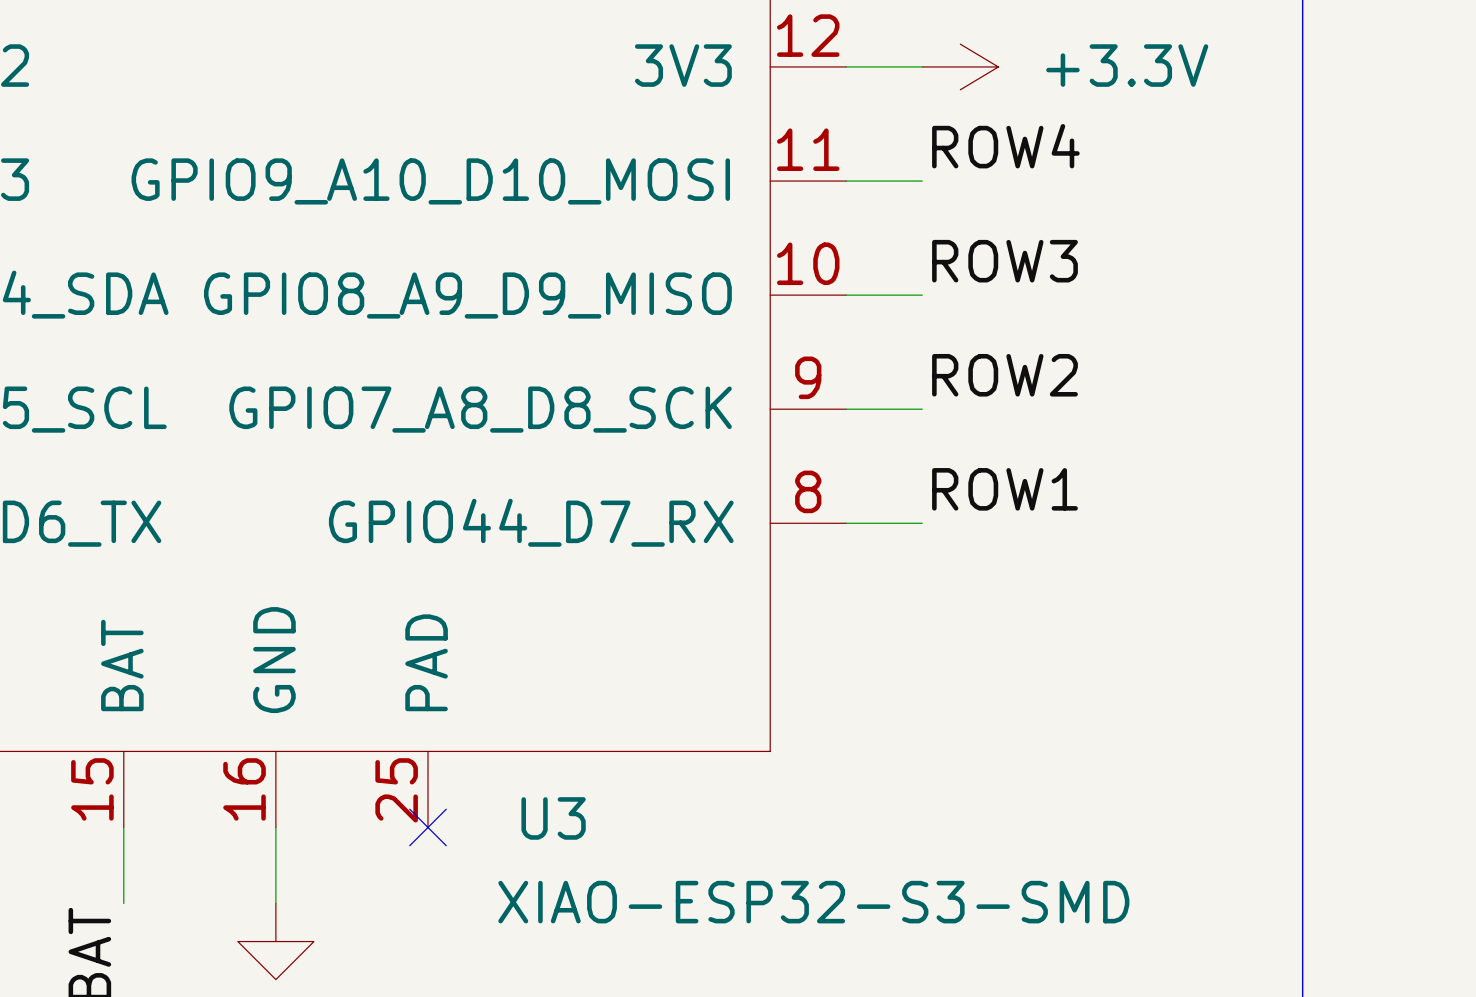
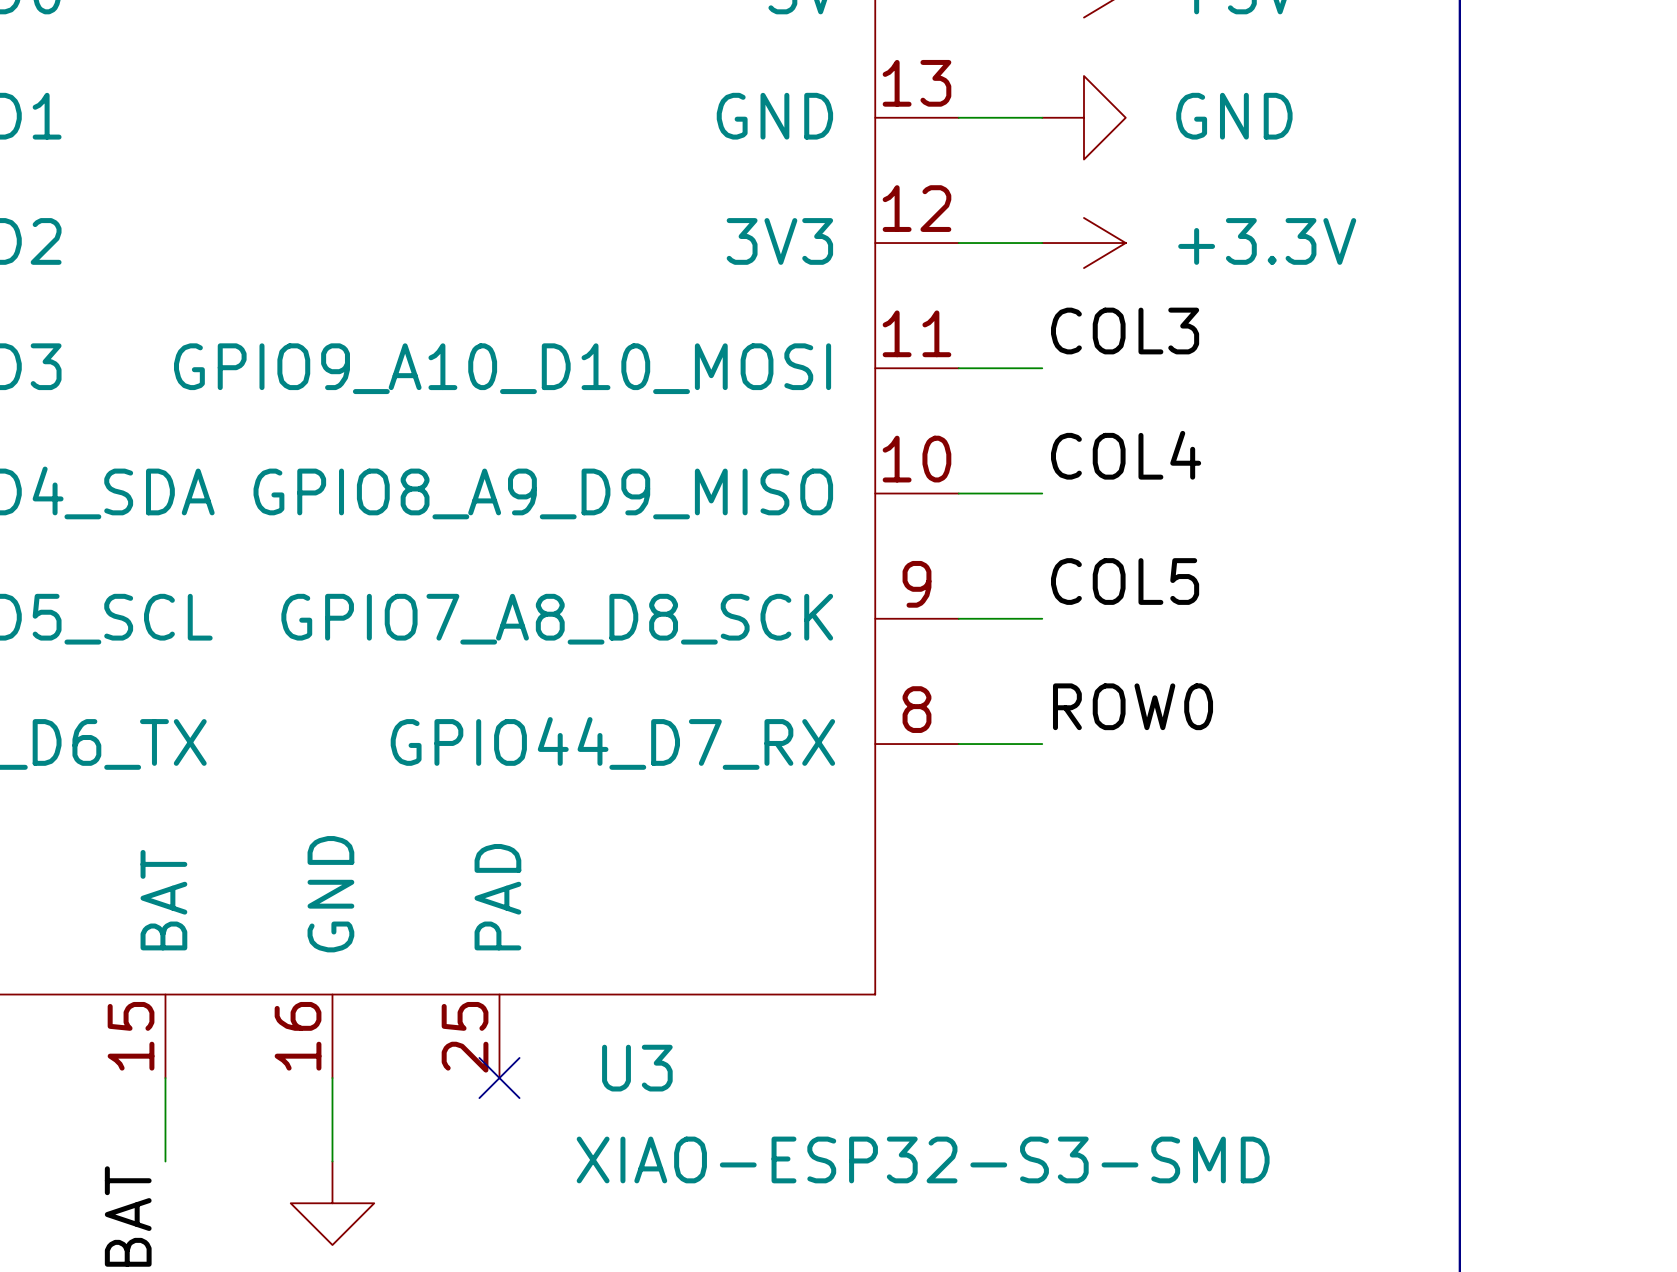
label: ROW4 (1005, 146) -> COL3 (1125, 331)
label: ROW3 (1004, 261) -> COL4 (1126, 455)
label: ROW2 (1004, 375) -> COL5 (1125, 581)
label: ROW1 (1004, 489) -> ROW0 (1133, 706)

